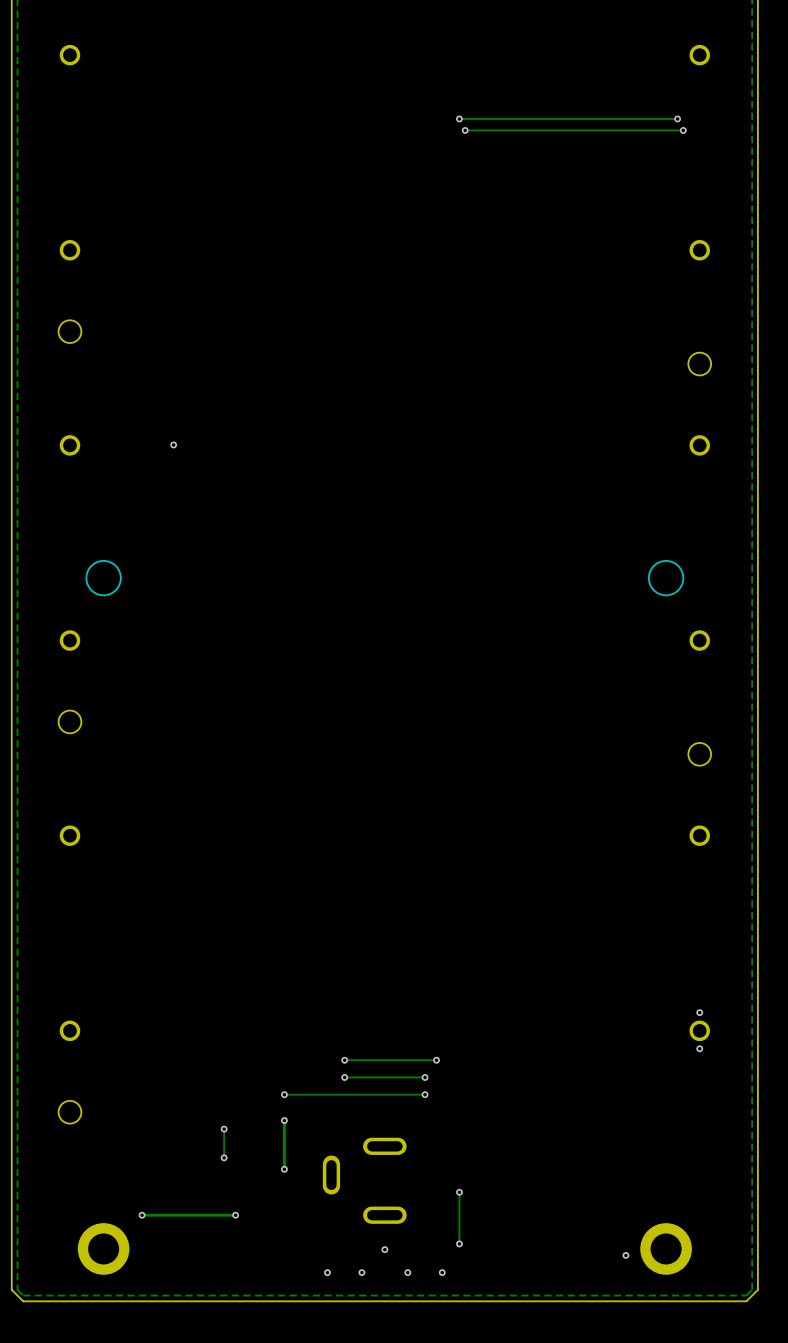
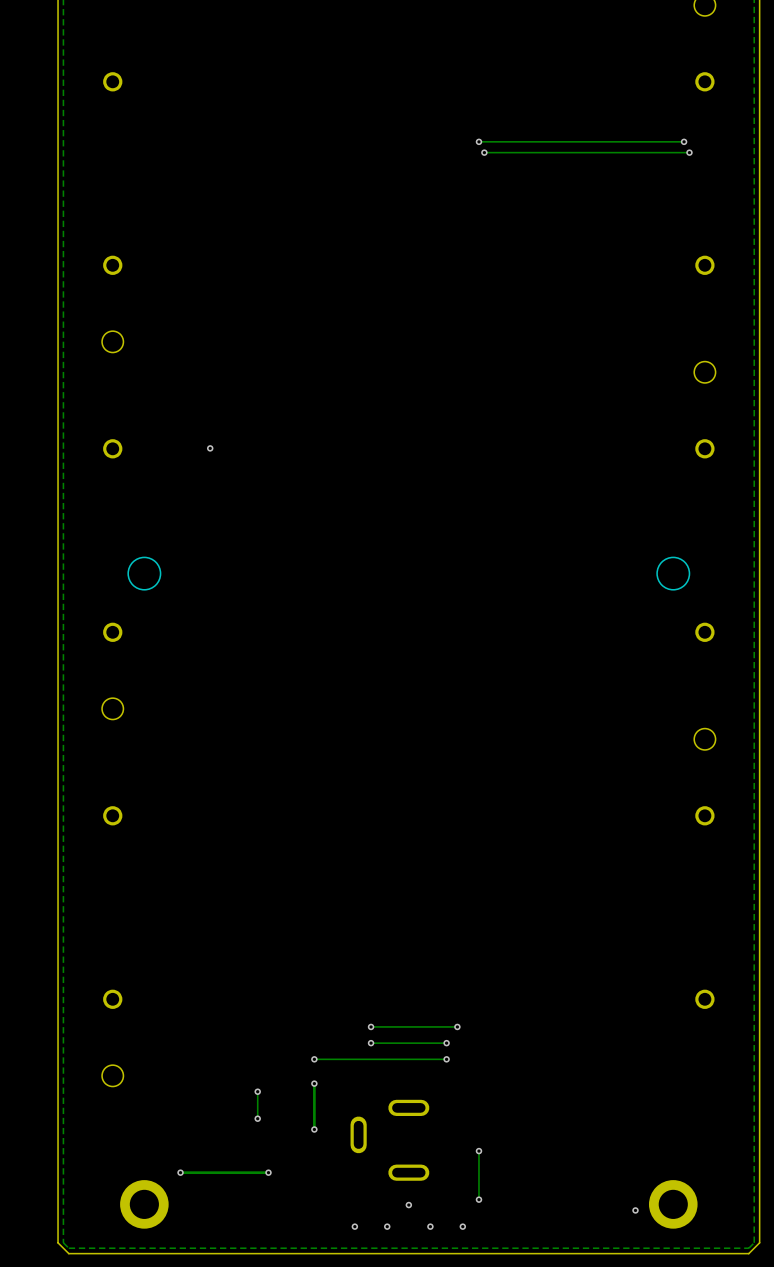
via: (699, 1012) -> none
via: (699, 1048) -> none

